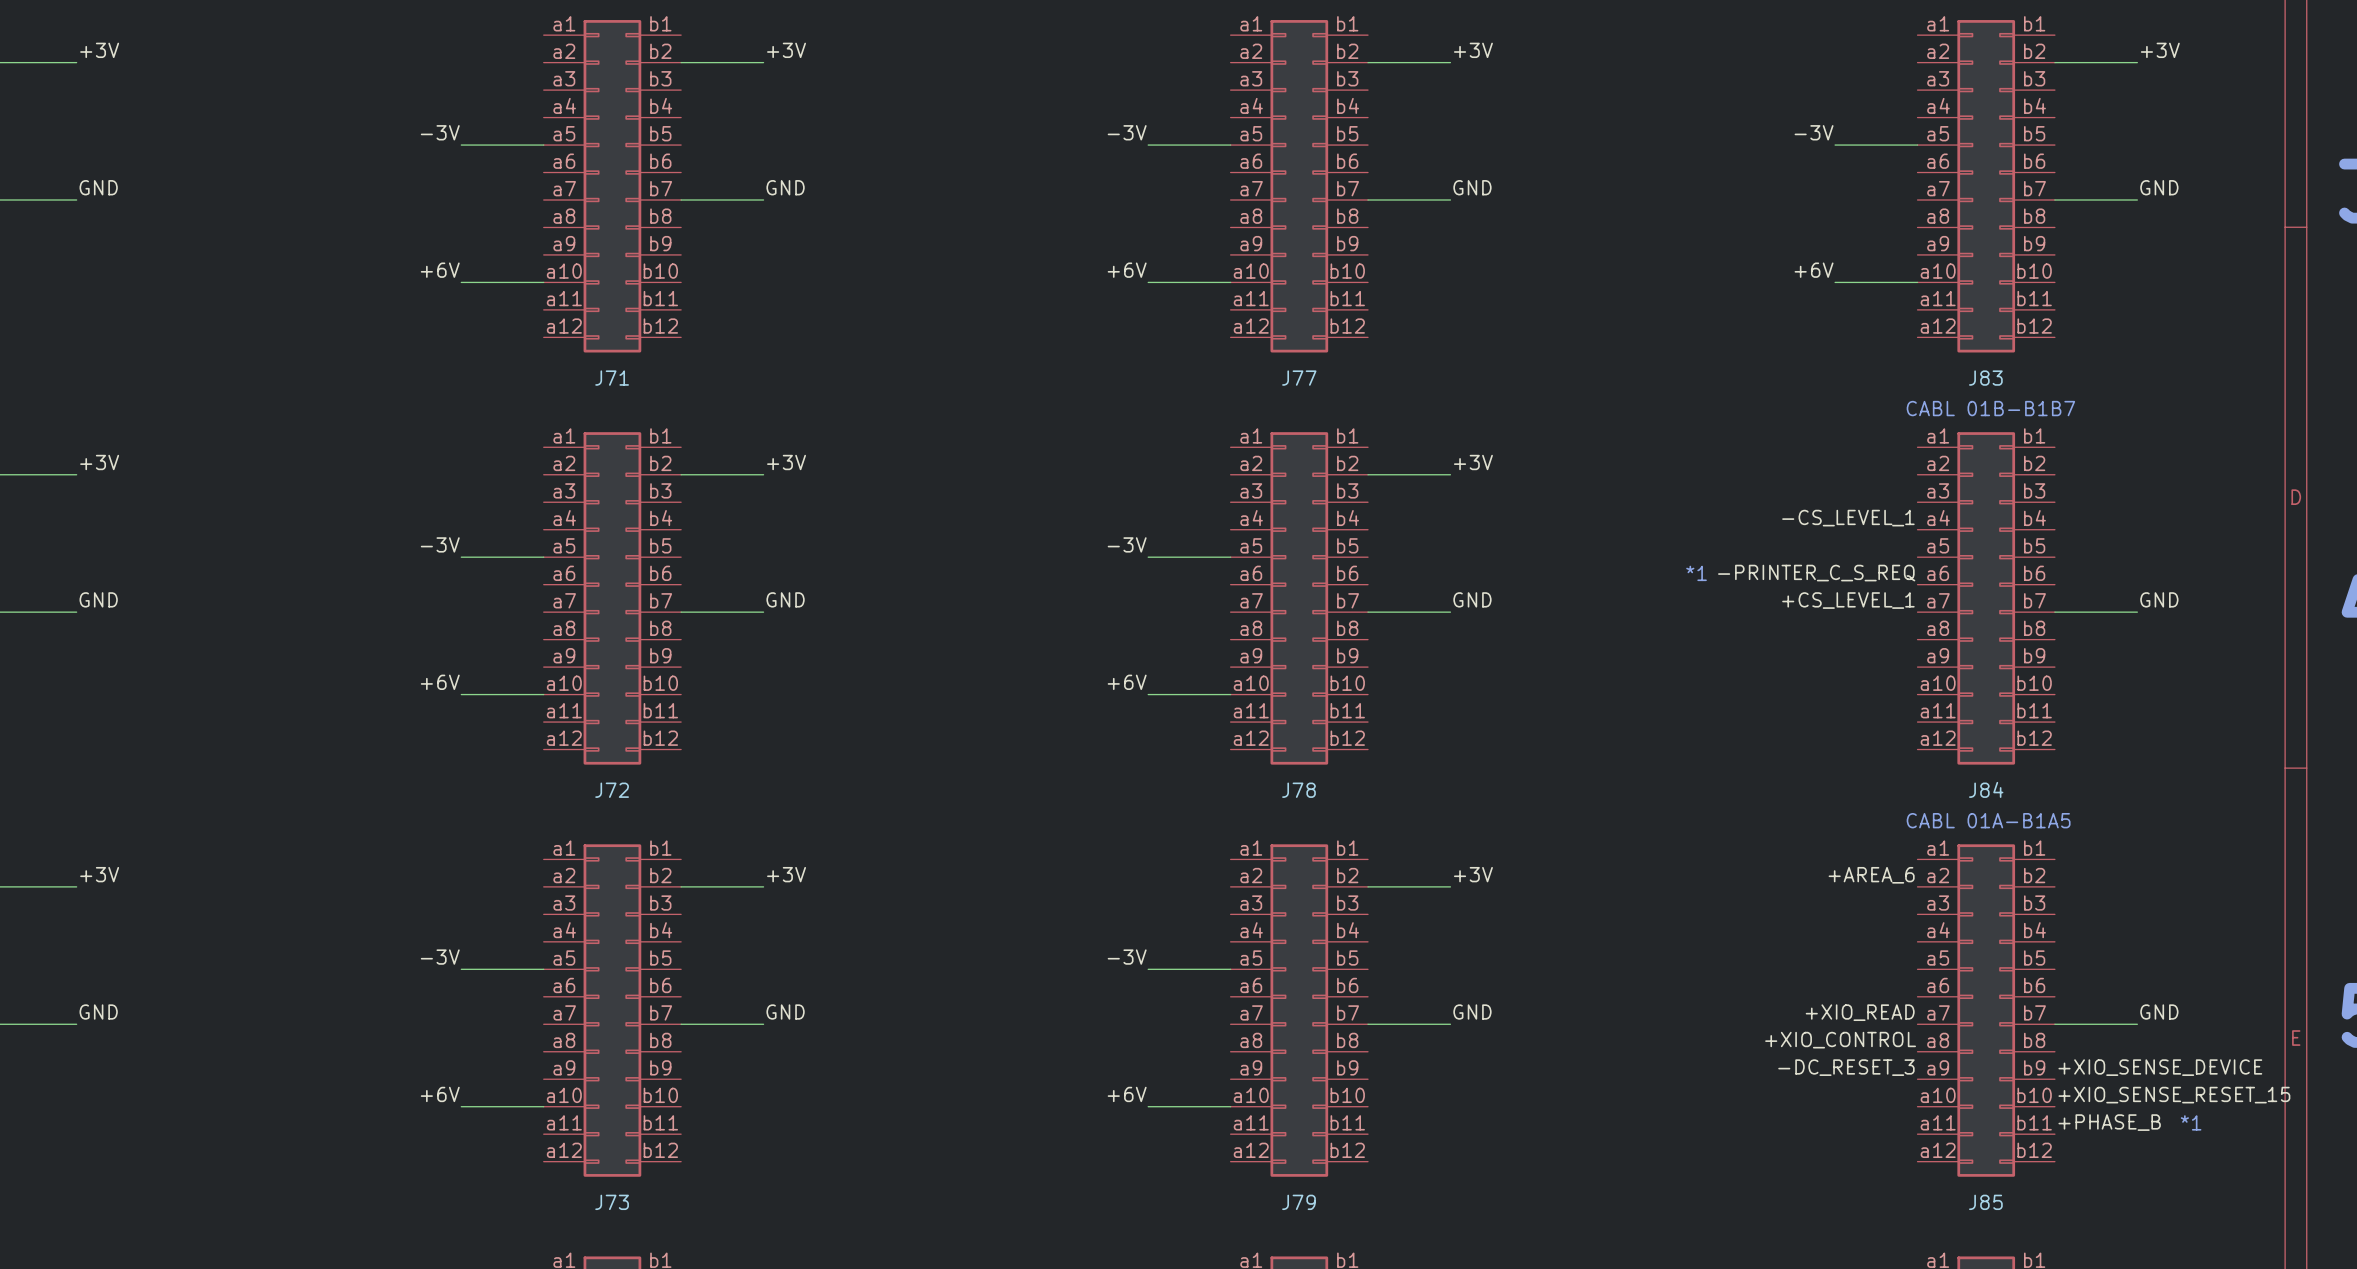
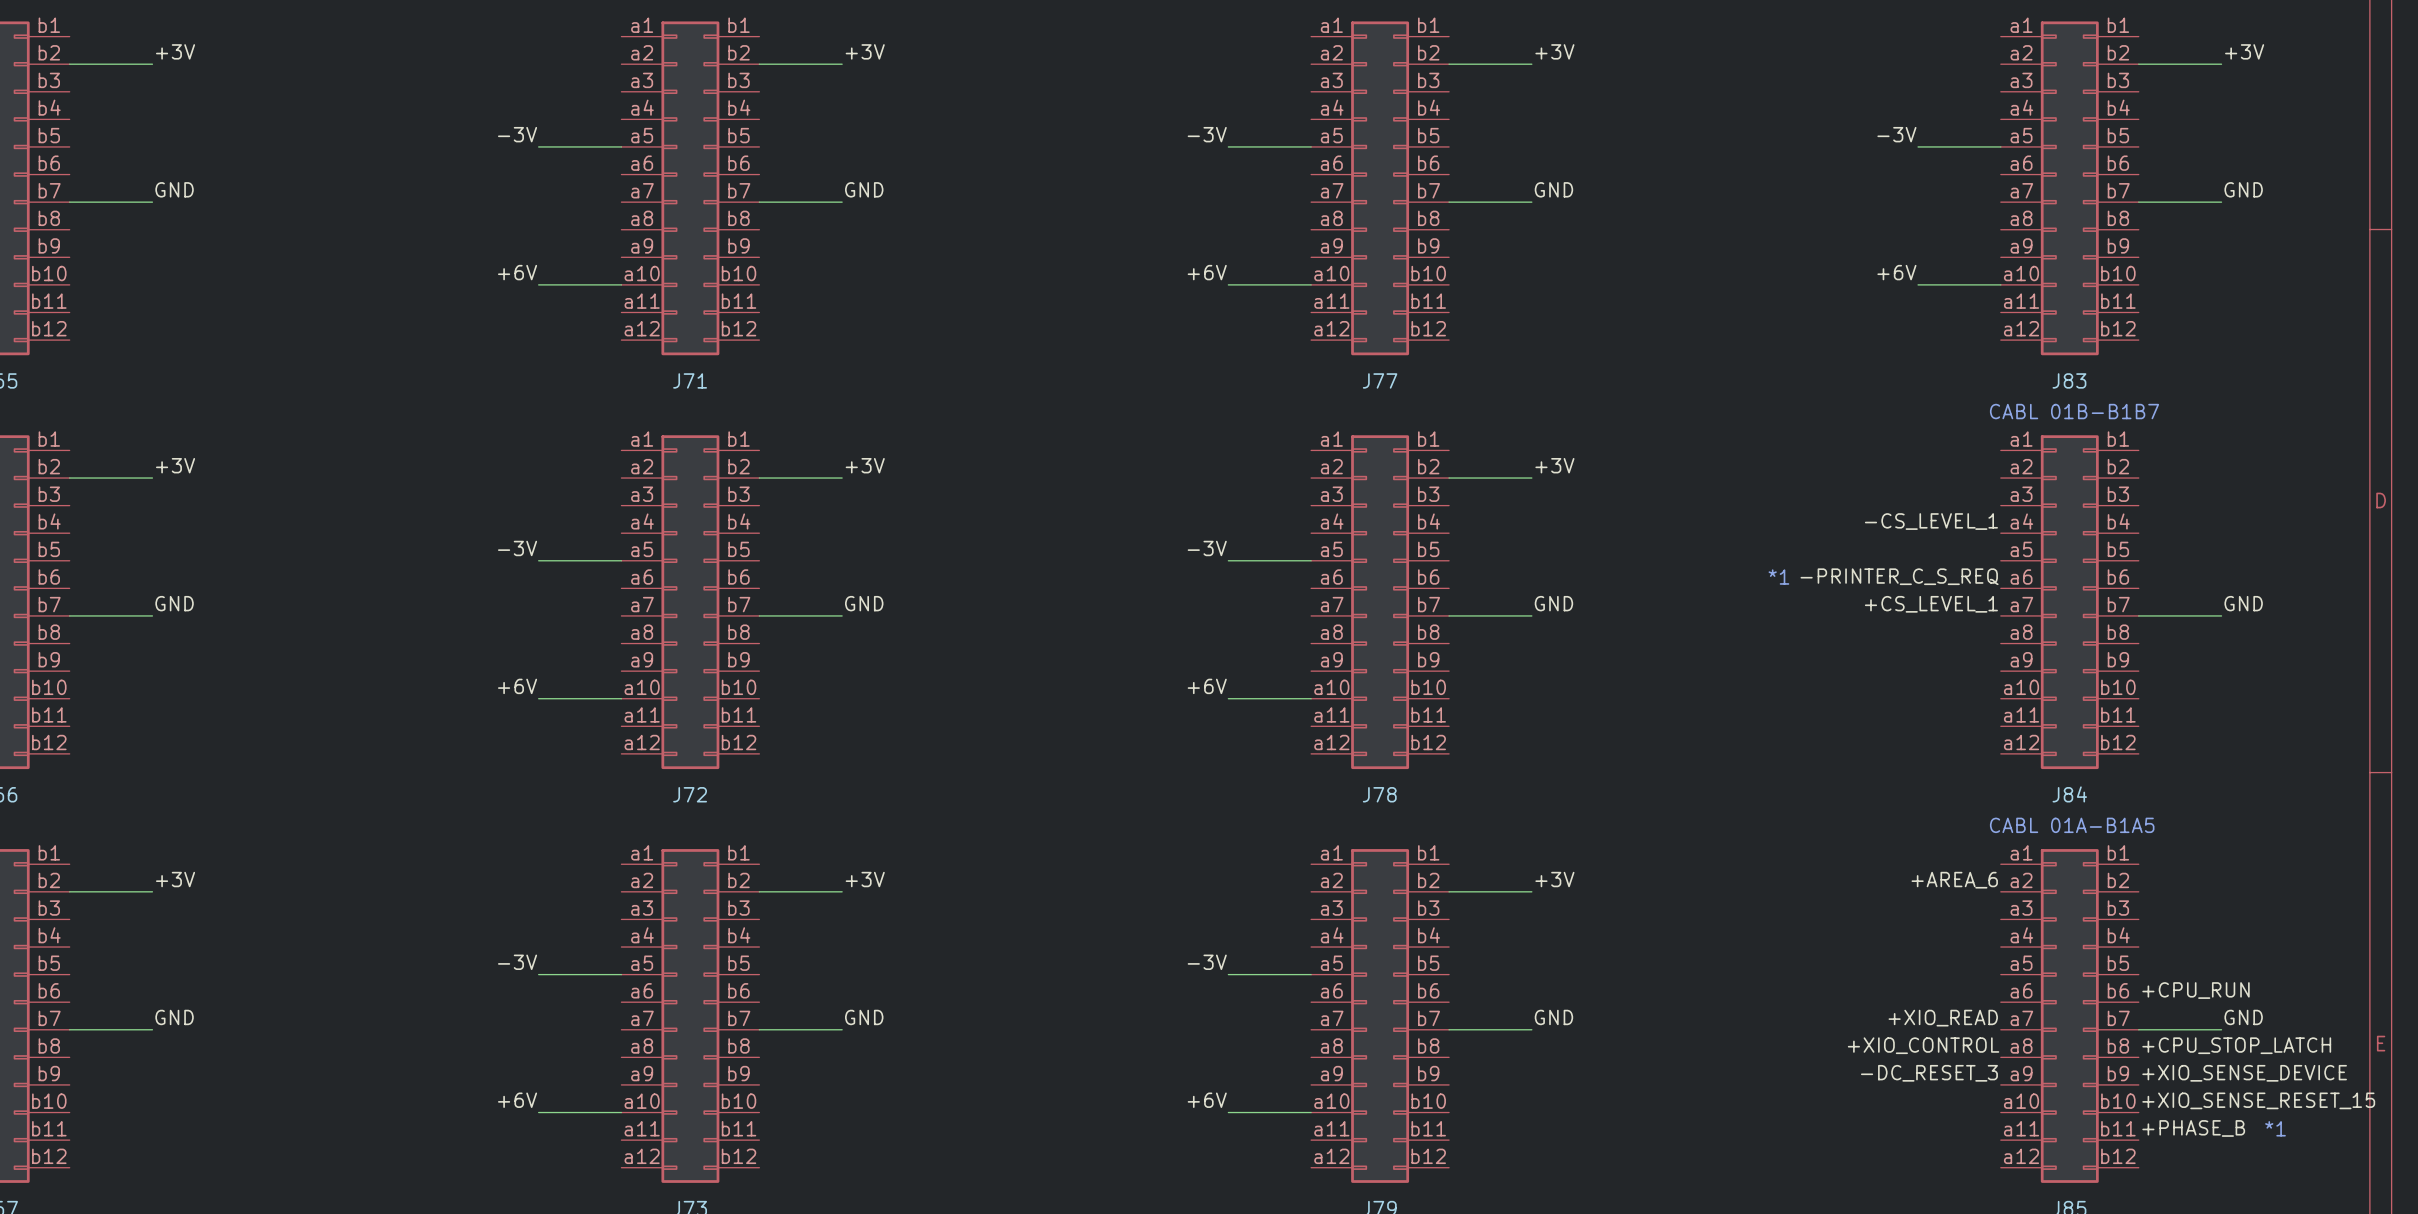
label: none -> +CPU_RUN (2196, 990)
label: none -> +CPU_STOP_LATCH (2236, 1045)

